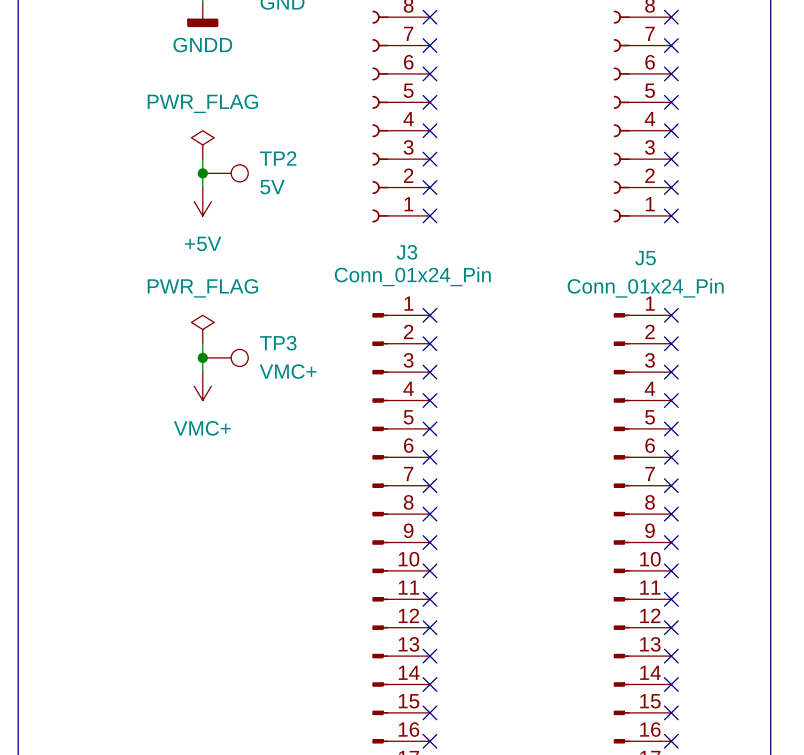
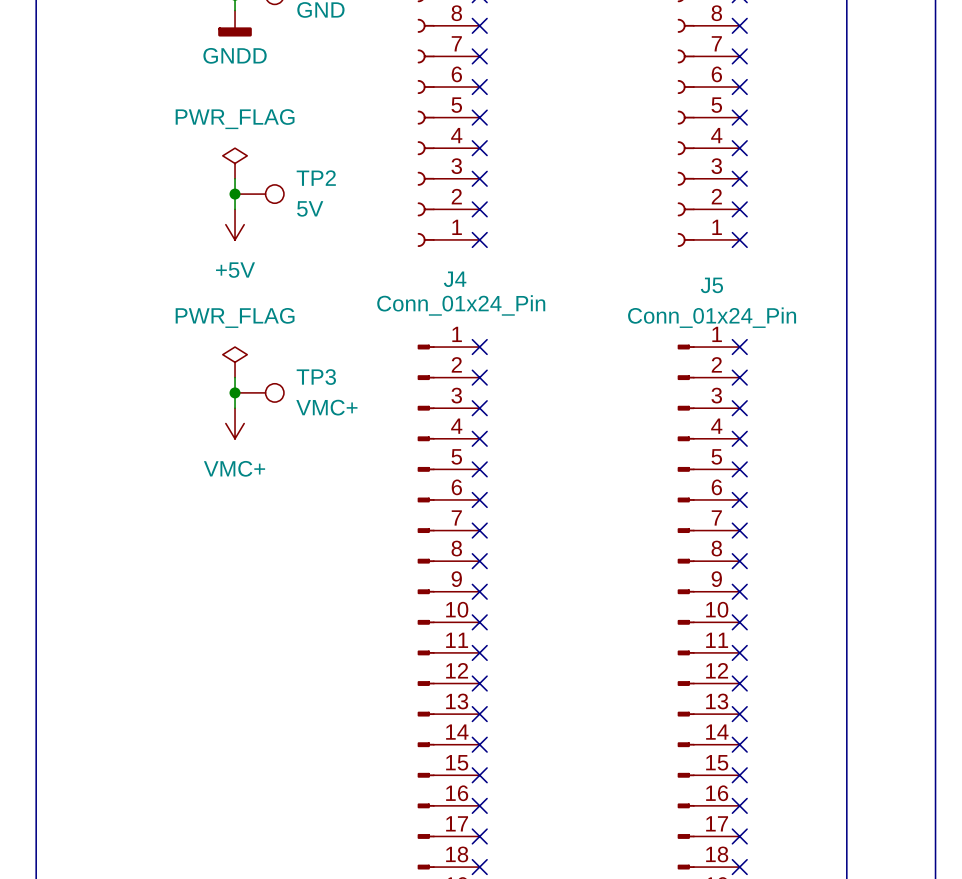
J3 name: J3 (406, 252) -> J4 (455, 279)

